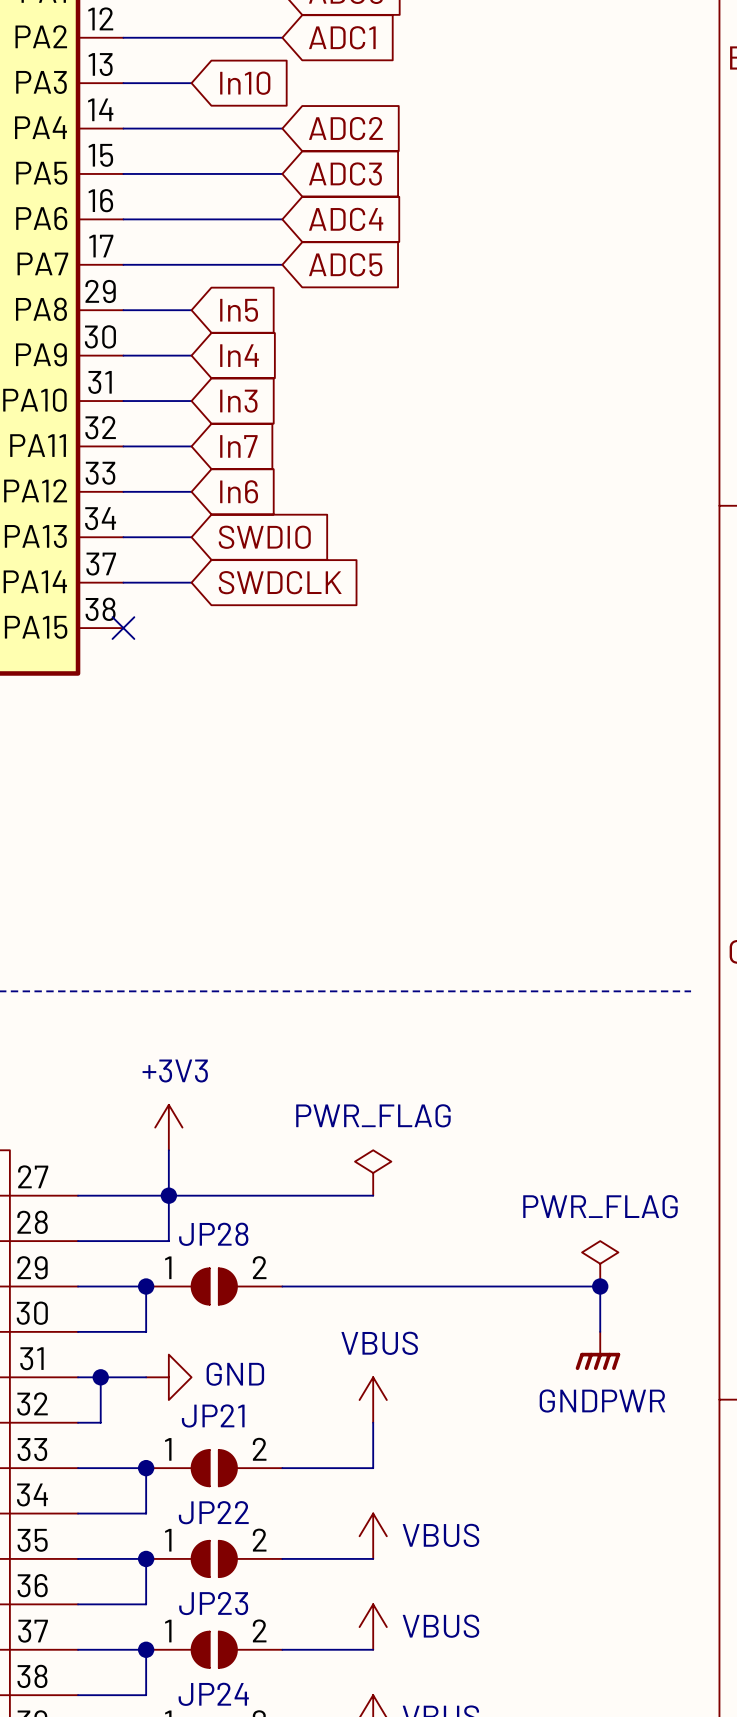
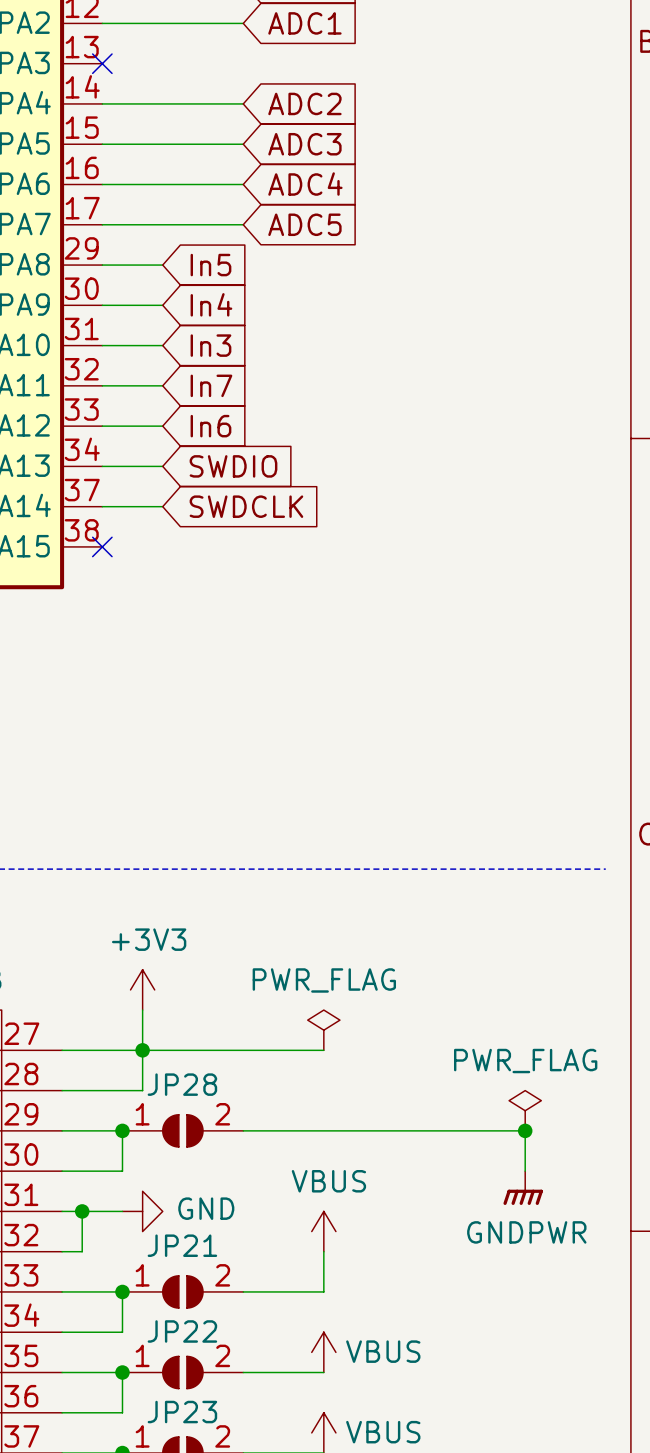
wire: (123, 83) (191, 83) -> none
no-connect mark: none -> (102, 63)
global label: In10 (245, 83) -> none

